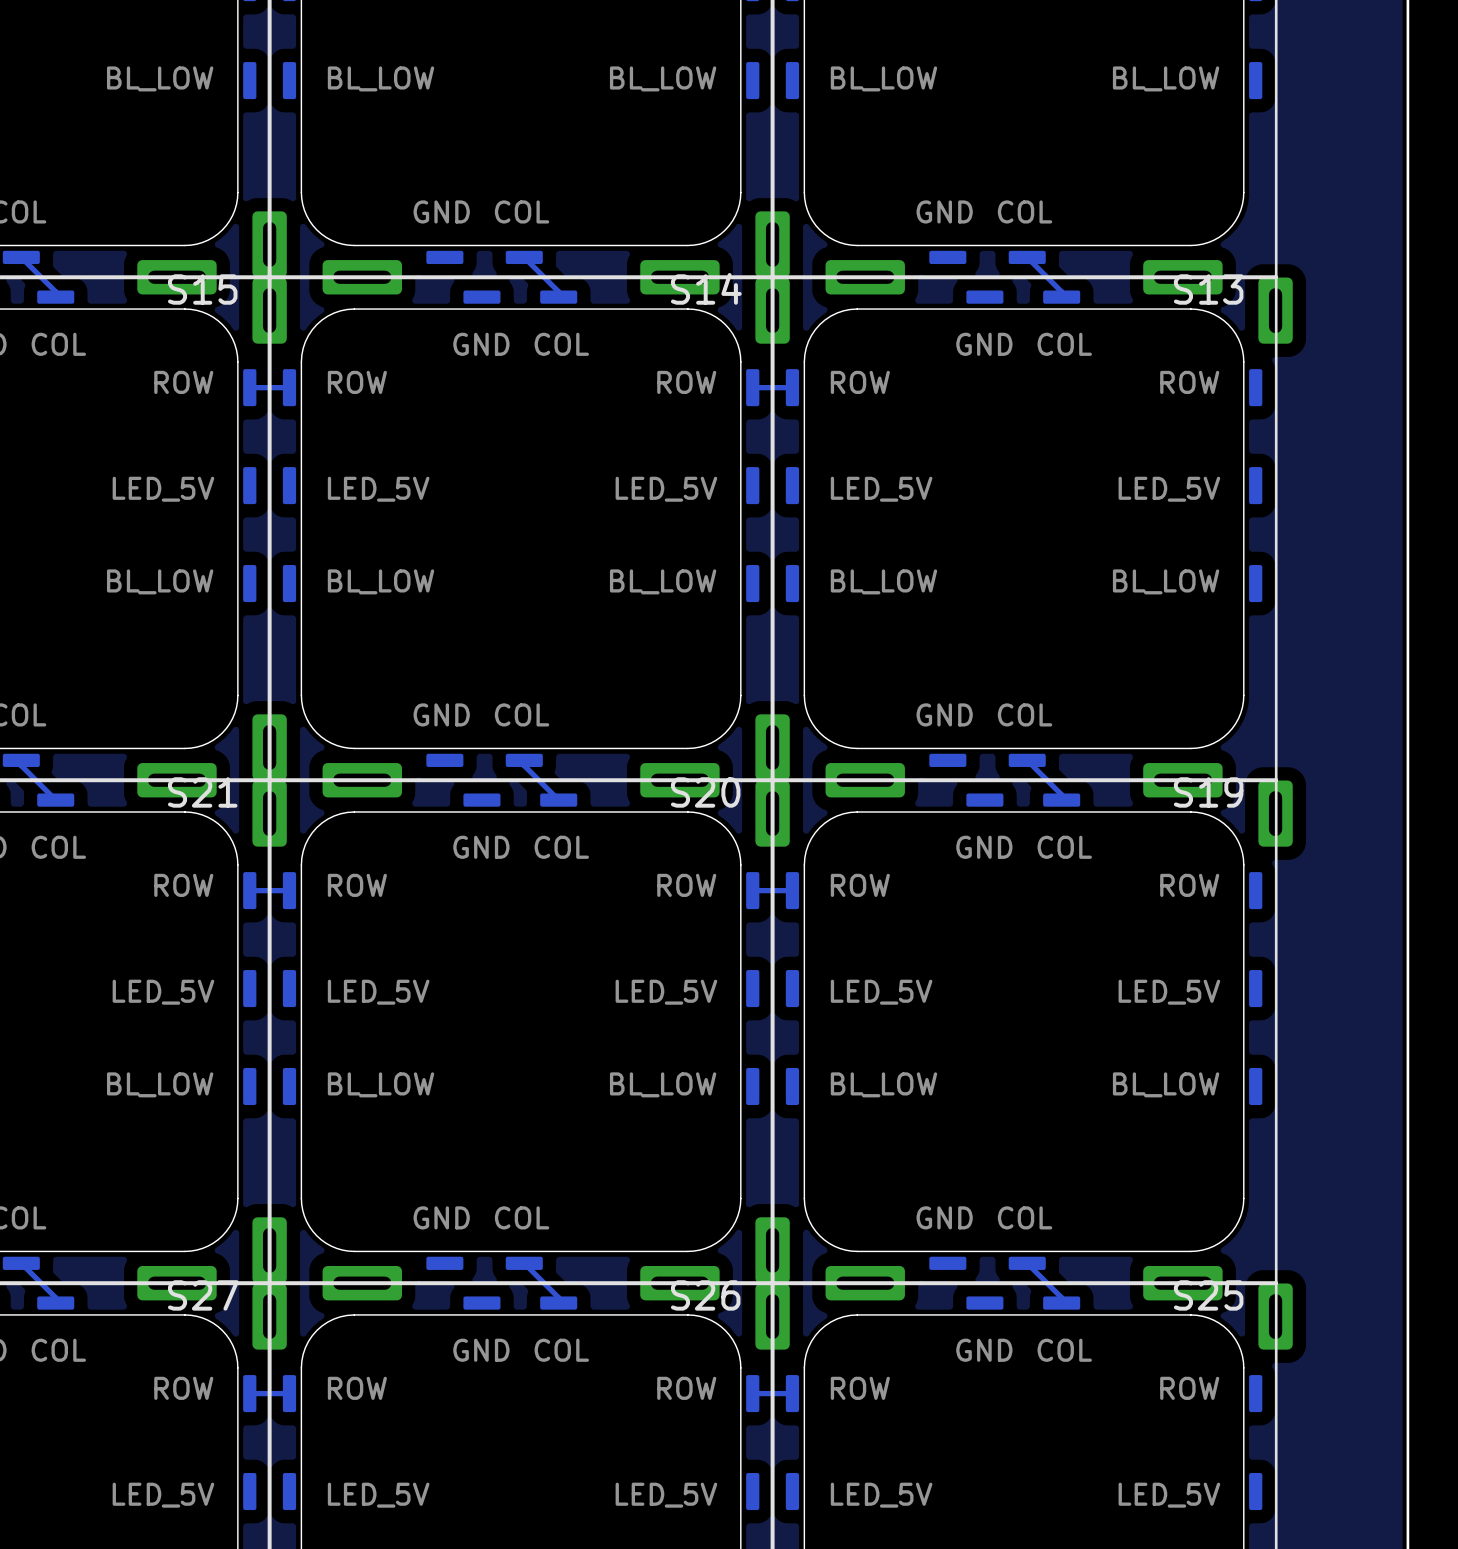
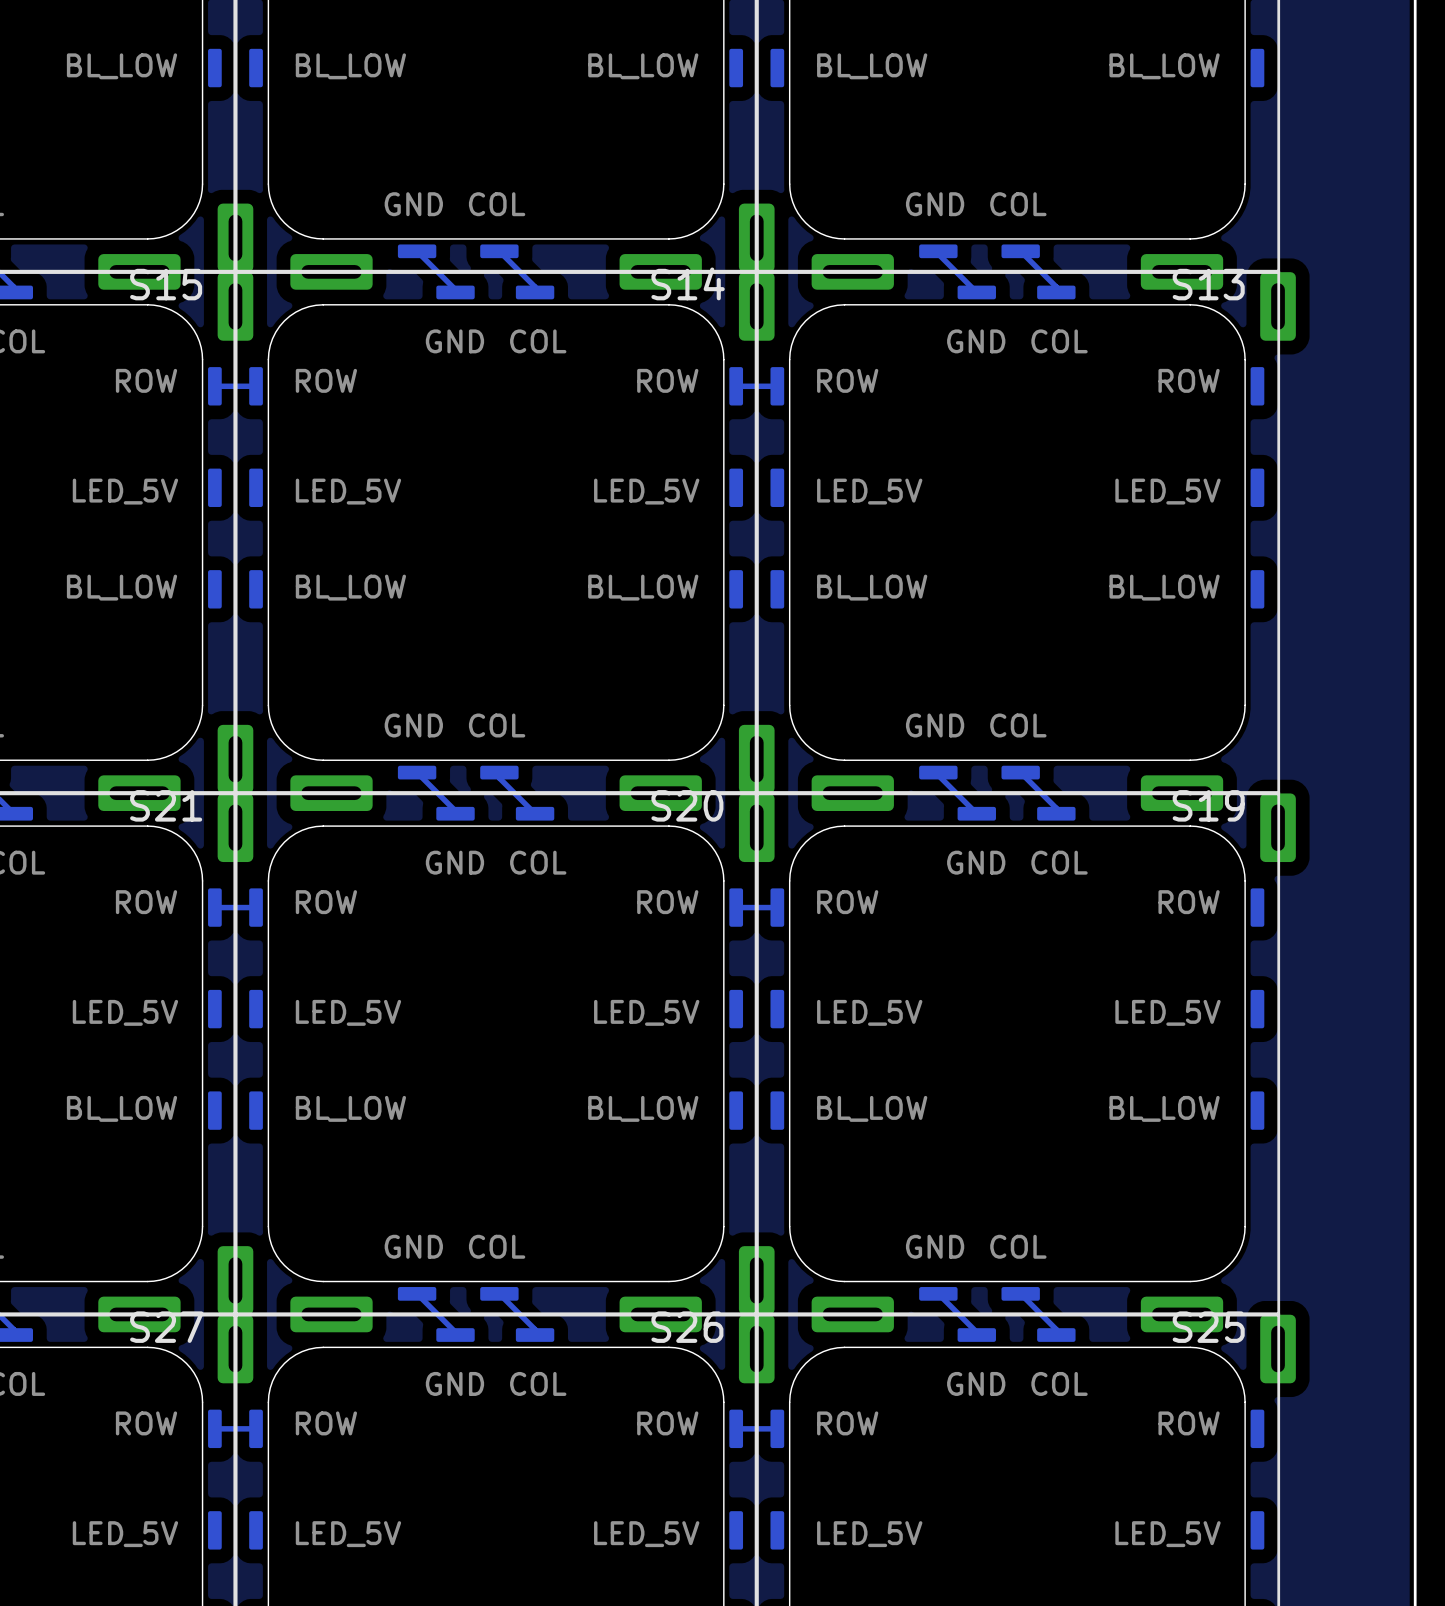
track: none -> (417, 251) (455, 289) (455, 292)
track: none -> (938, 251) (938, 254) (976, 292)
track: none -> (417, 772) (455, 810) (455, 813)
track: none -> (938, 772) (938, 775) (976, 813)
track: none -> (417, 1293) (455, 1332) (455, 1335)
track: none -> (938, 1293) (976, 1332) (976, 1335)

